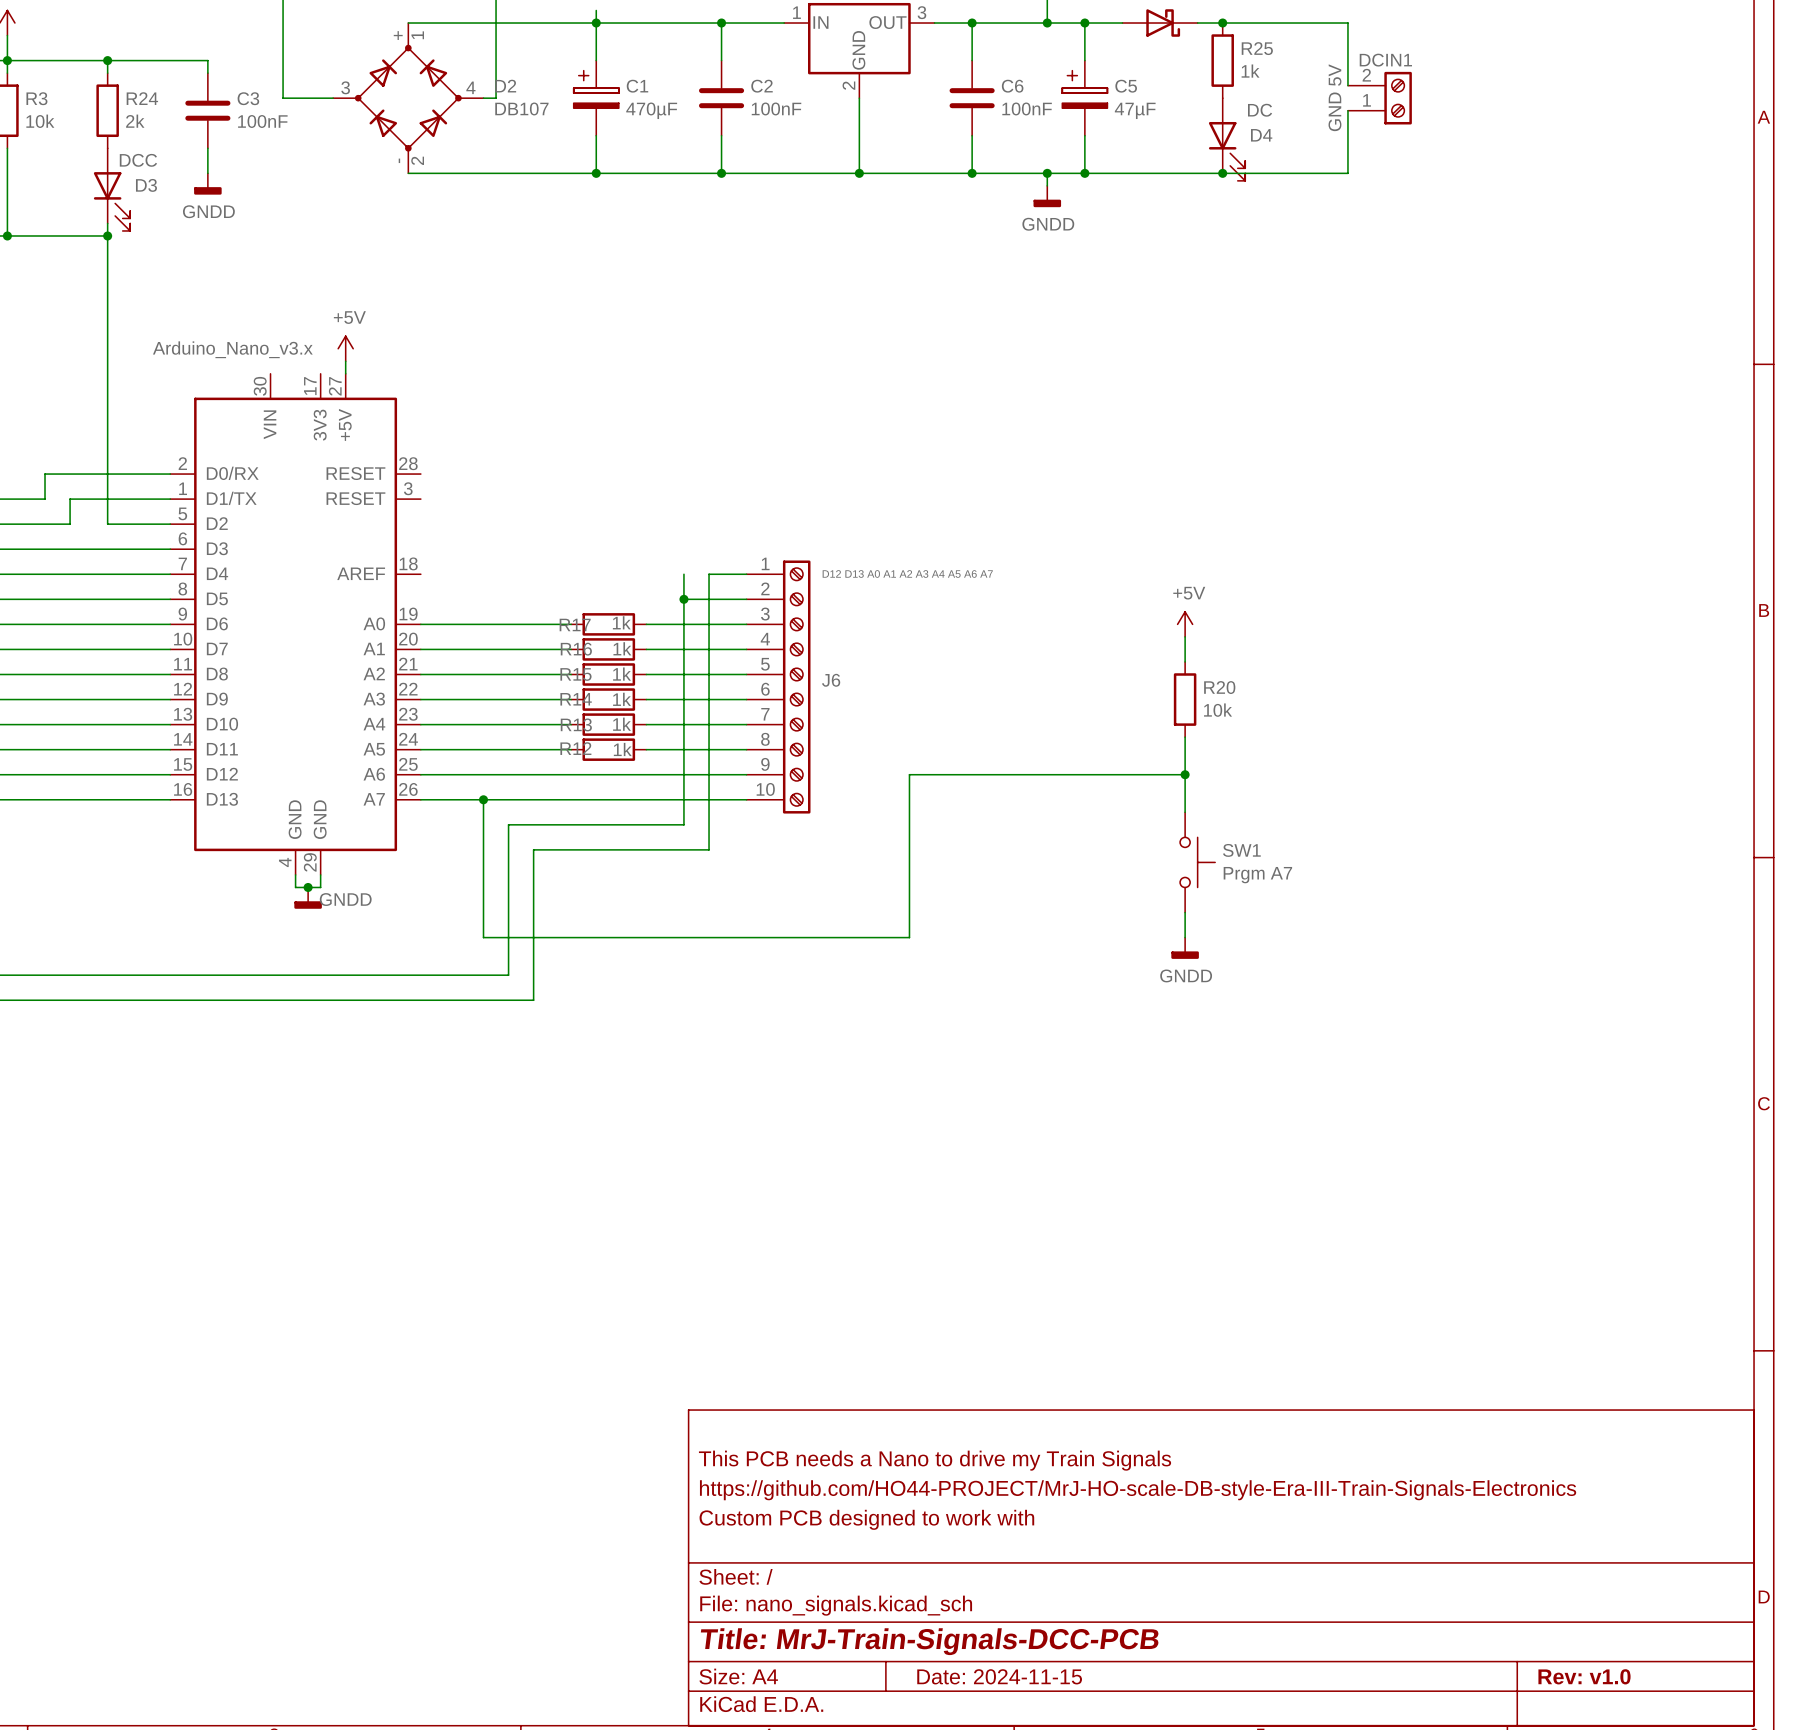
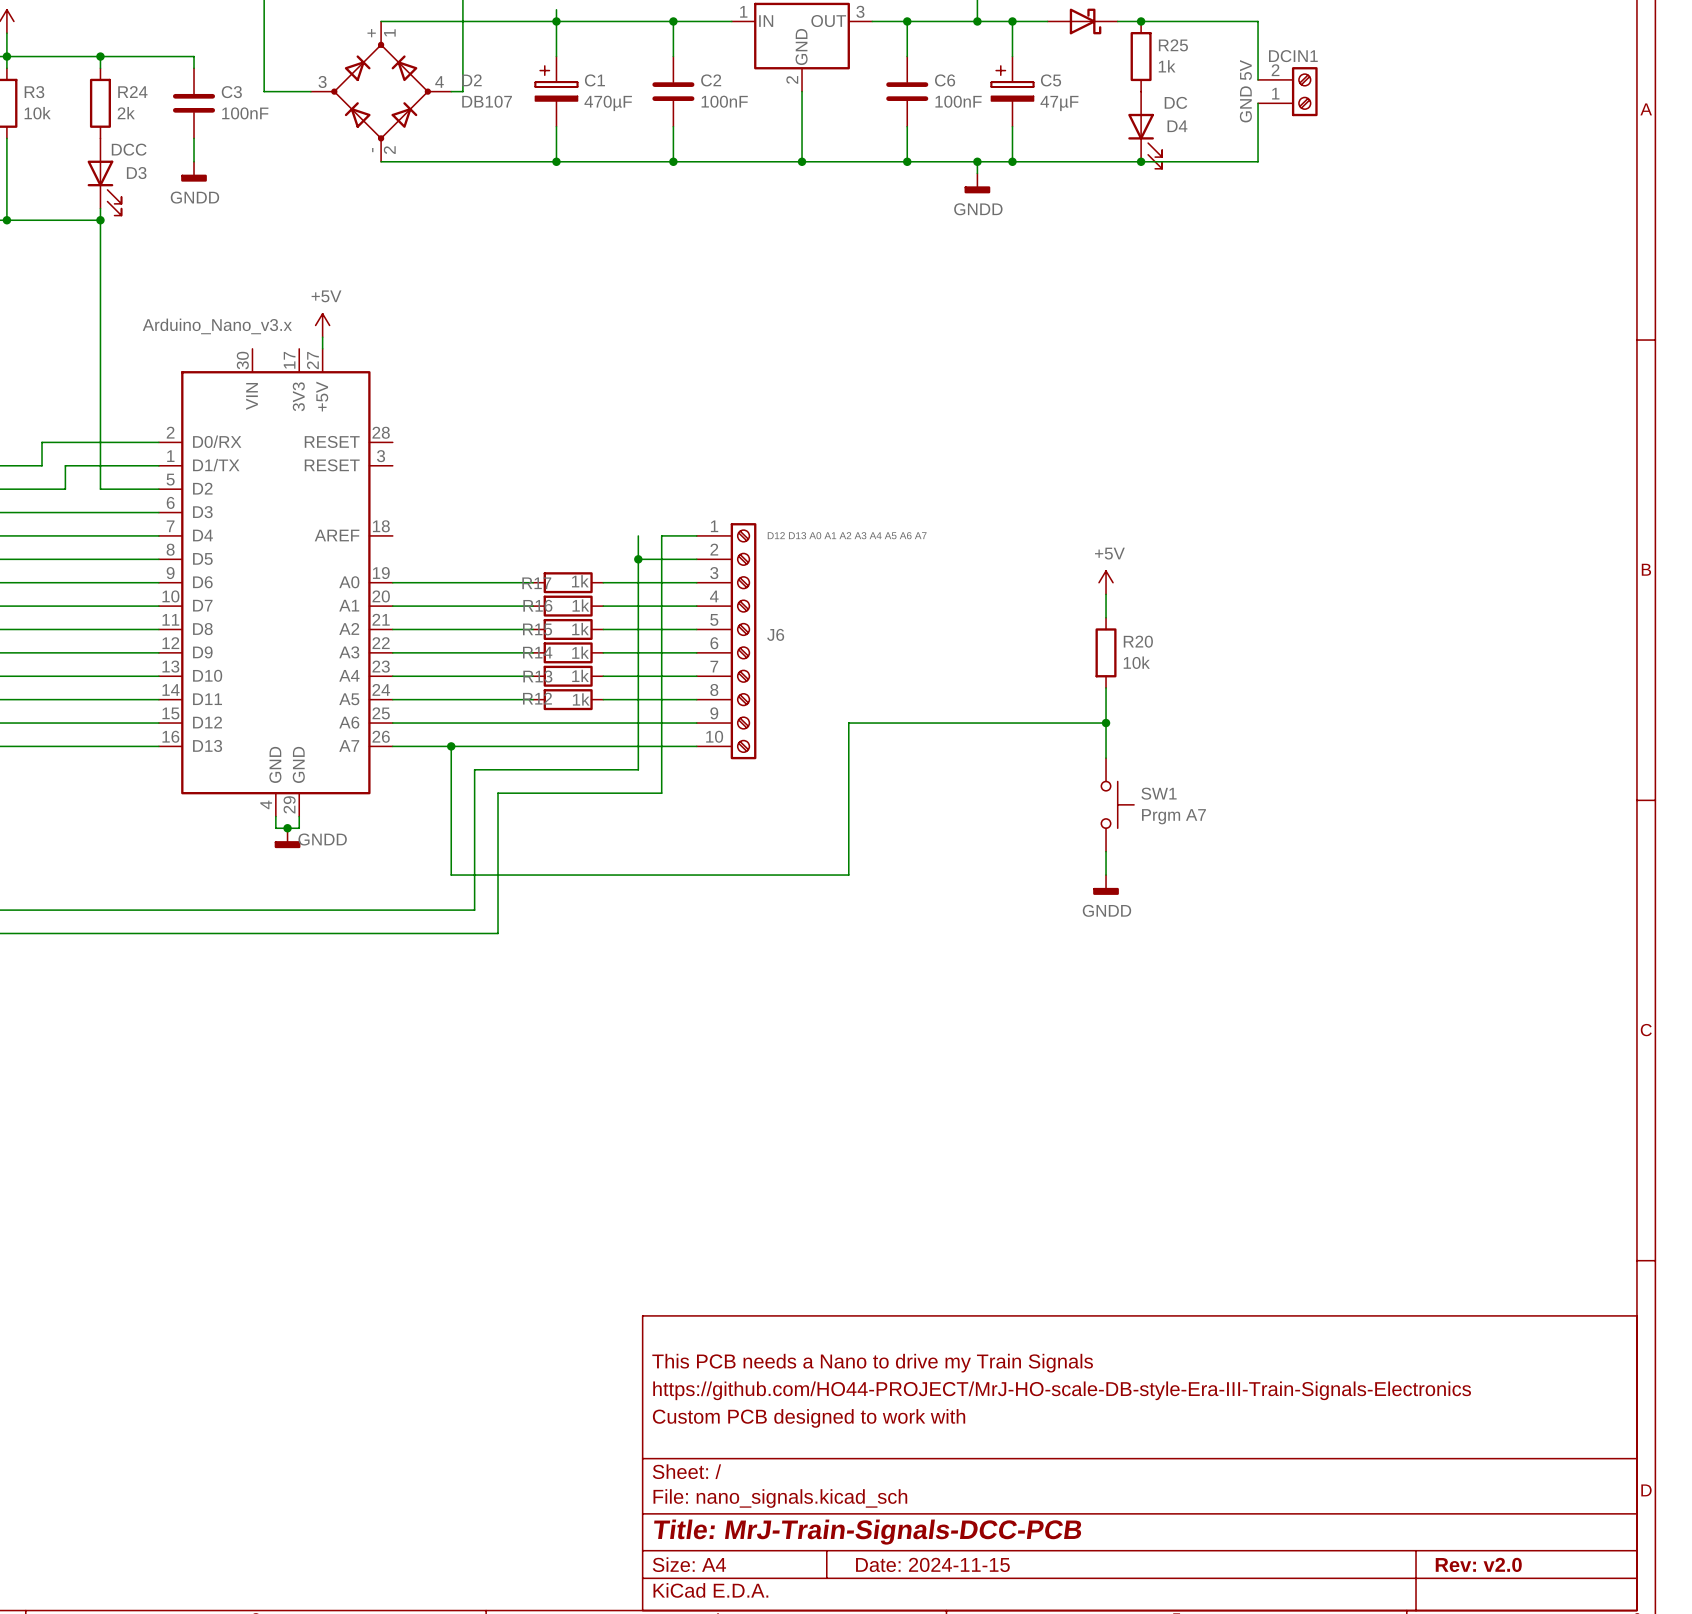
title block: Rev: v1.0 (1584, 1676) -> Rev: v2.0 (1478, 1564)

